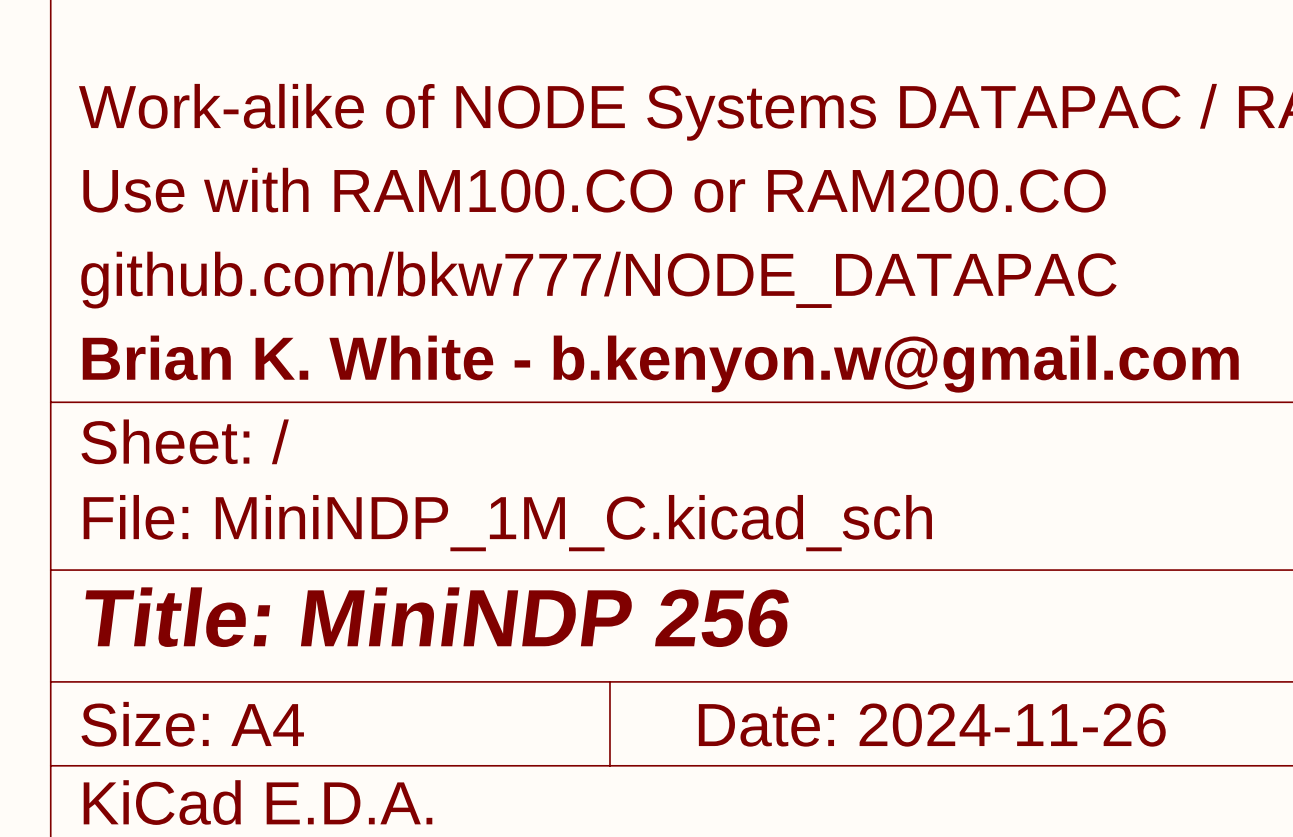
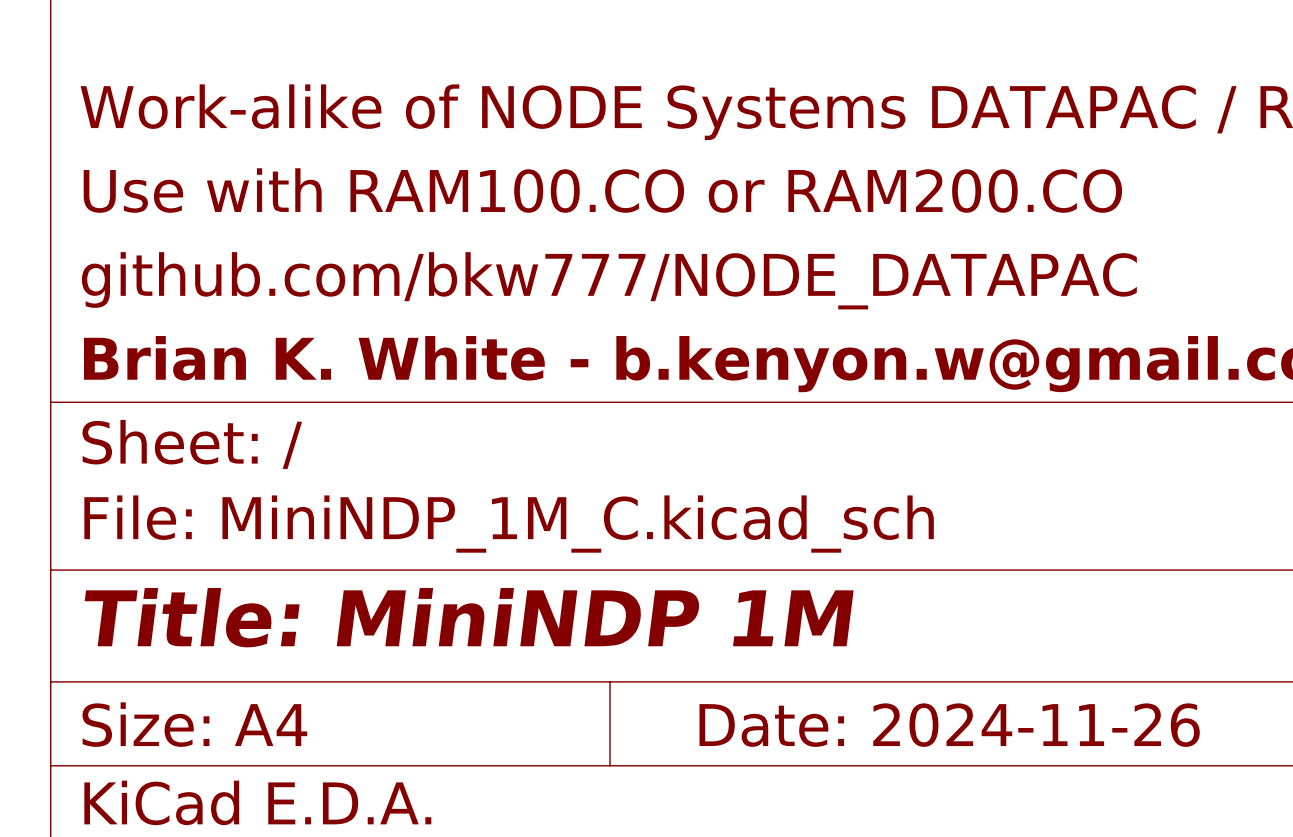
title block: Title: MiniNDP 256 (437, 617) -> Title: MiniNDP 1M (469, 617)

